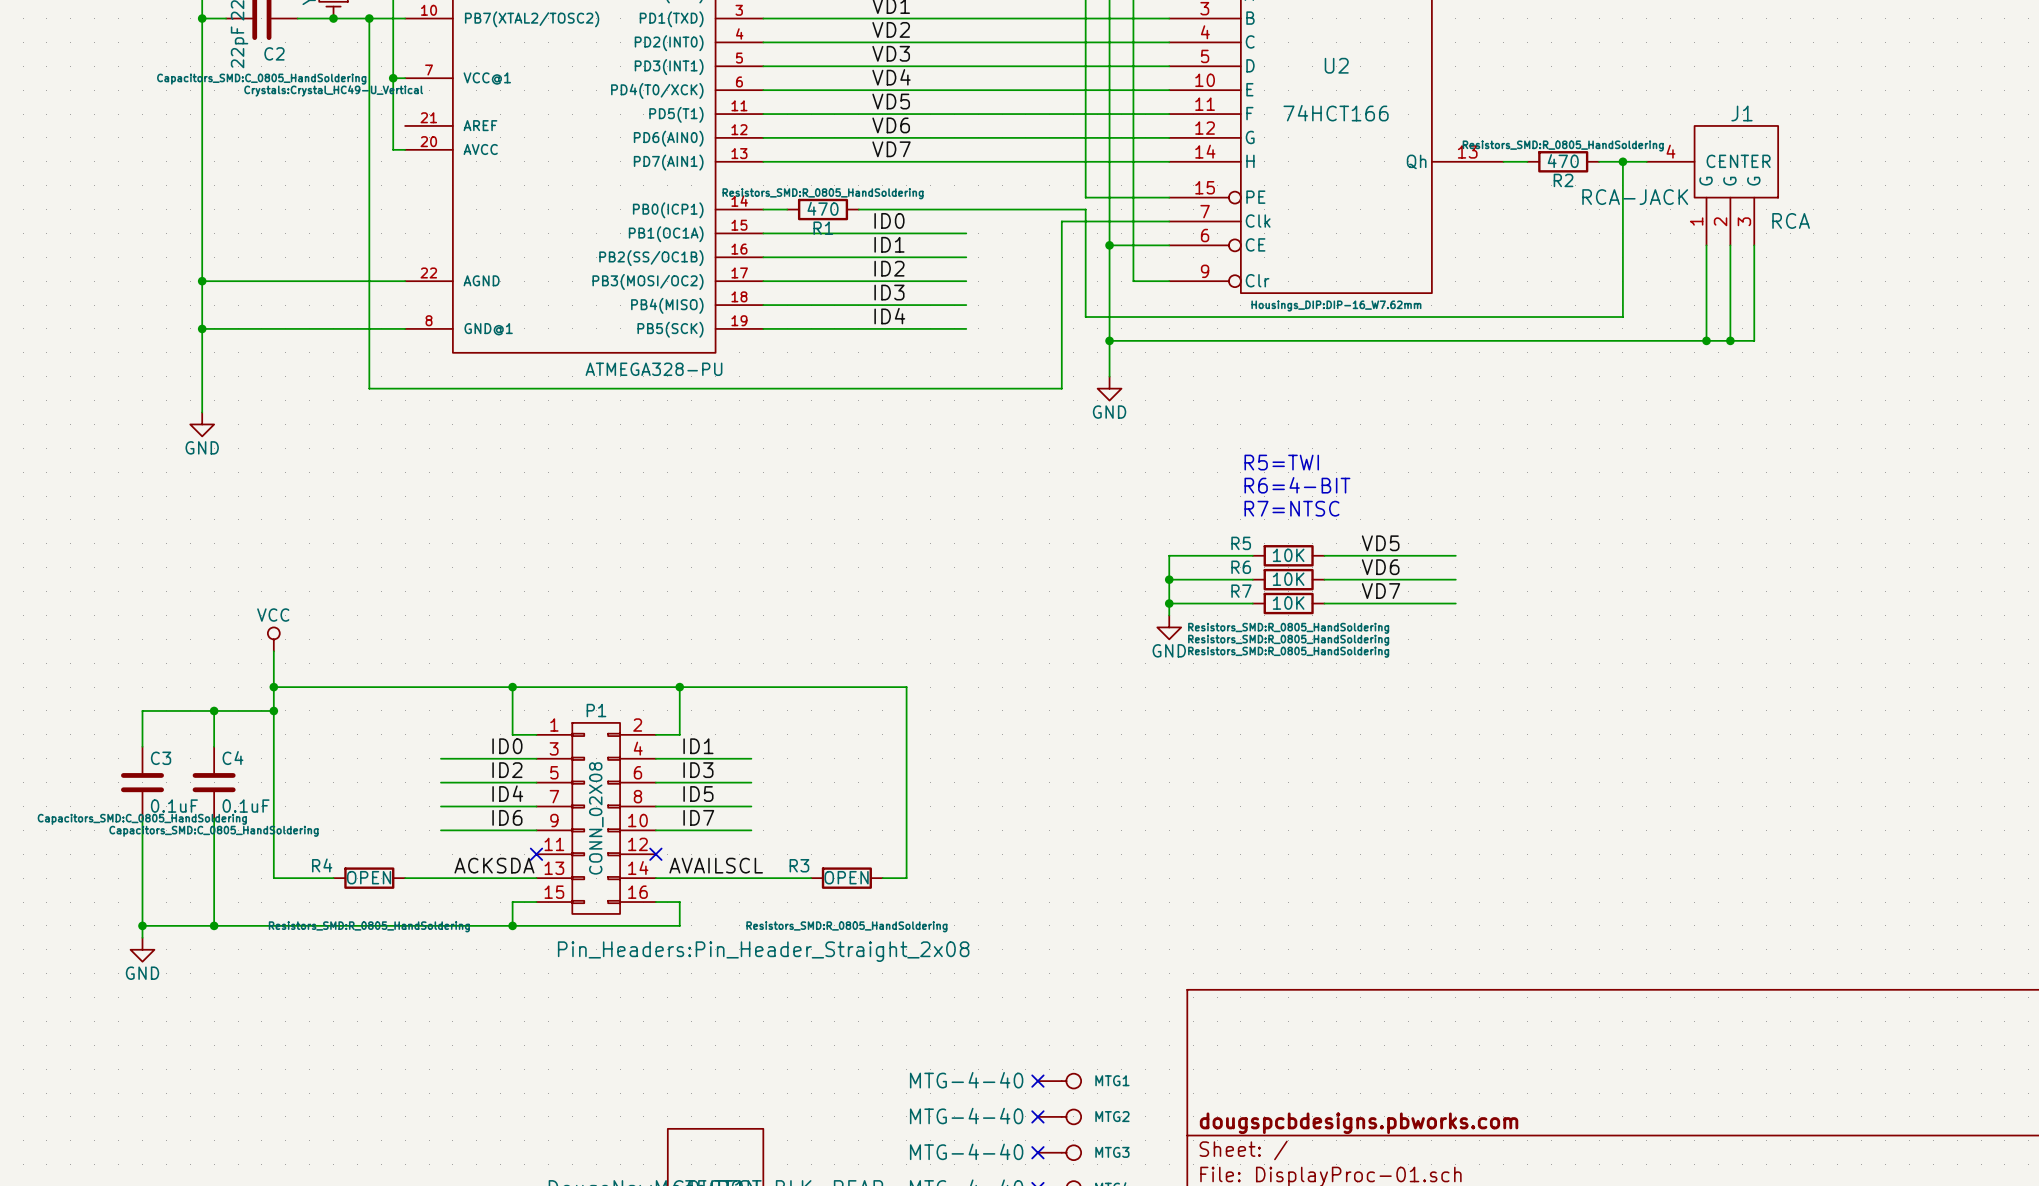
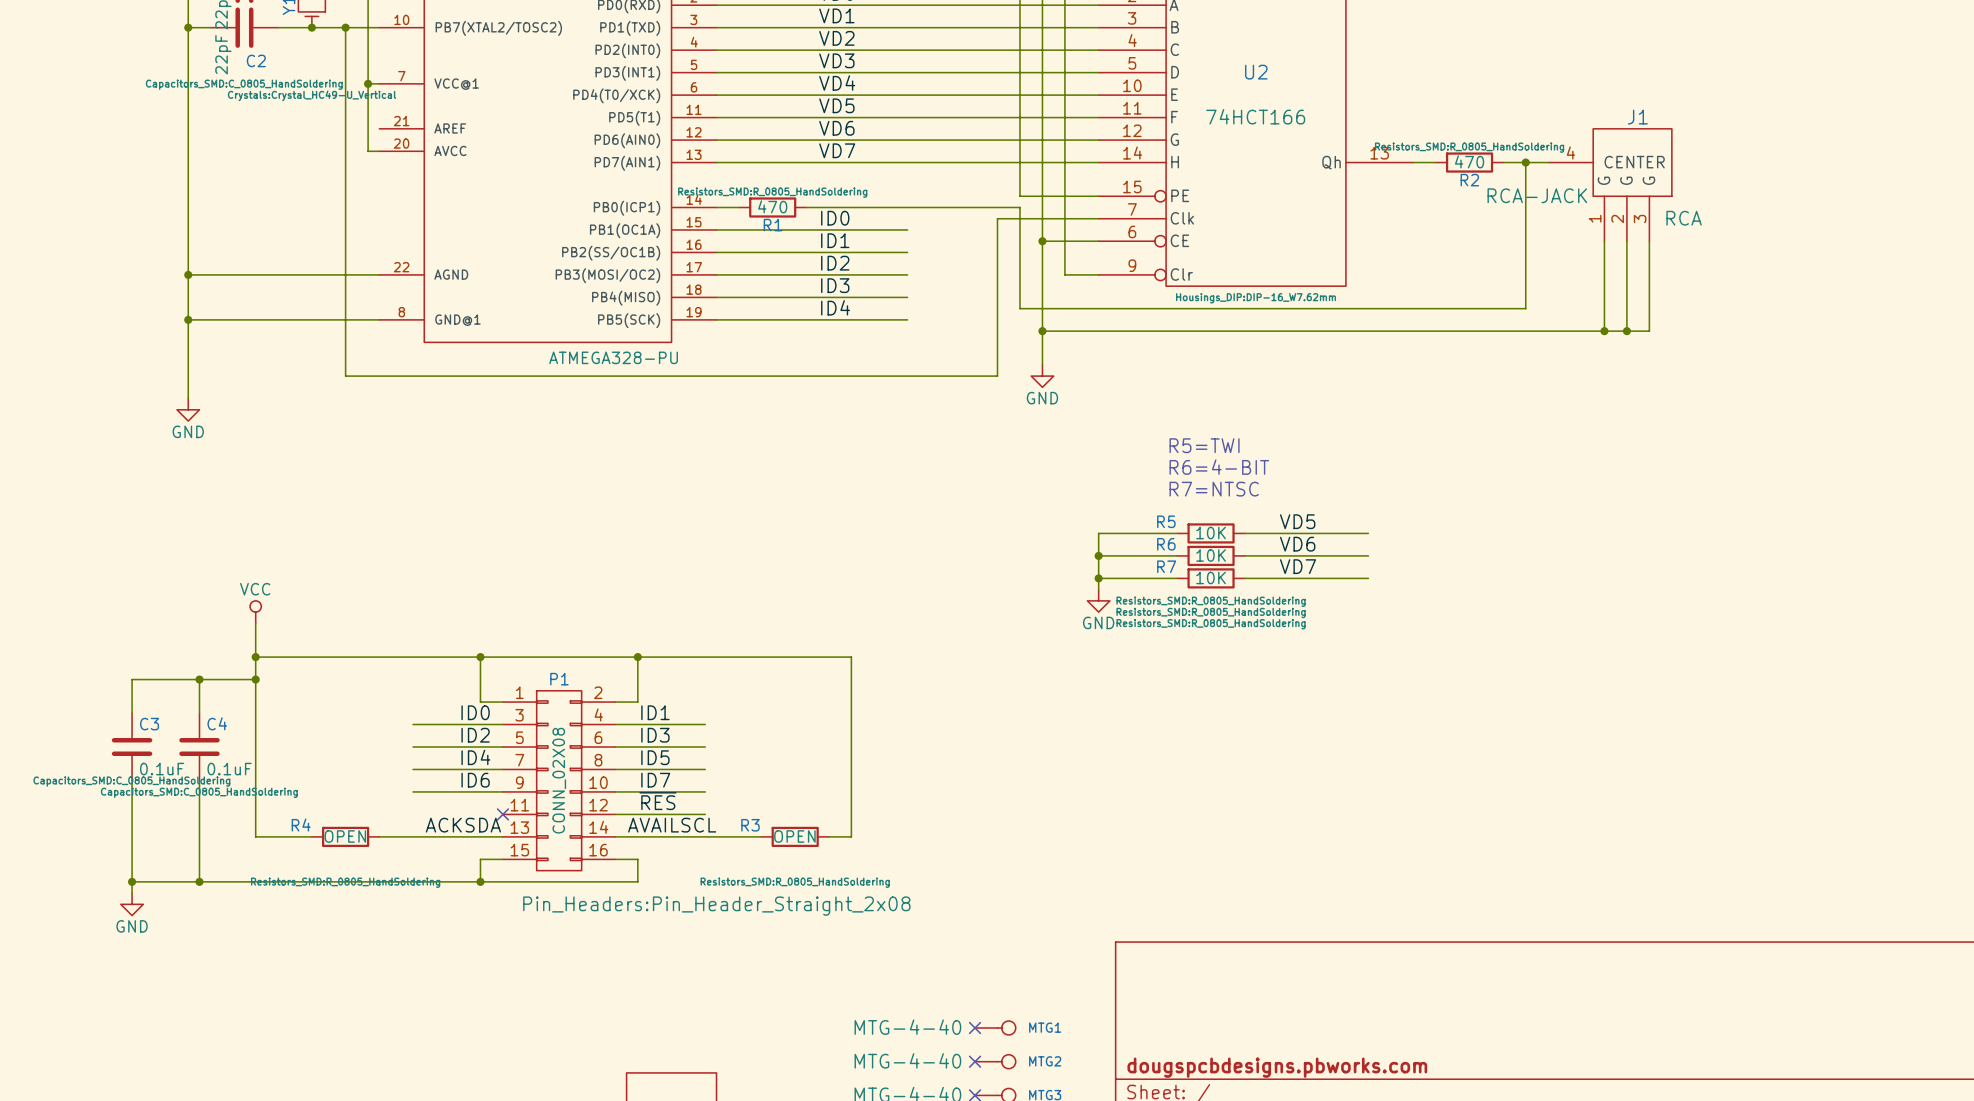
label: none -> ~{RES} (657, 801)
wire: none -> (615, 814) (705, 814)
no-connect mark: (655, 854) -> none

